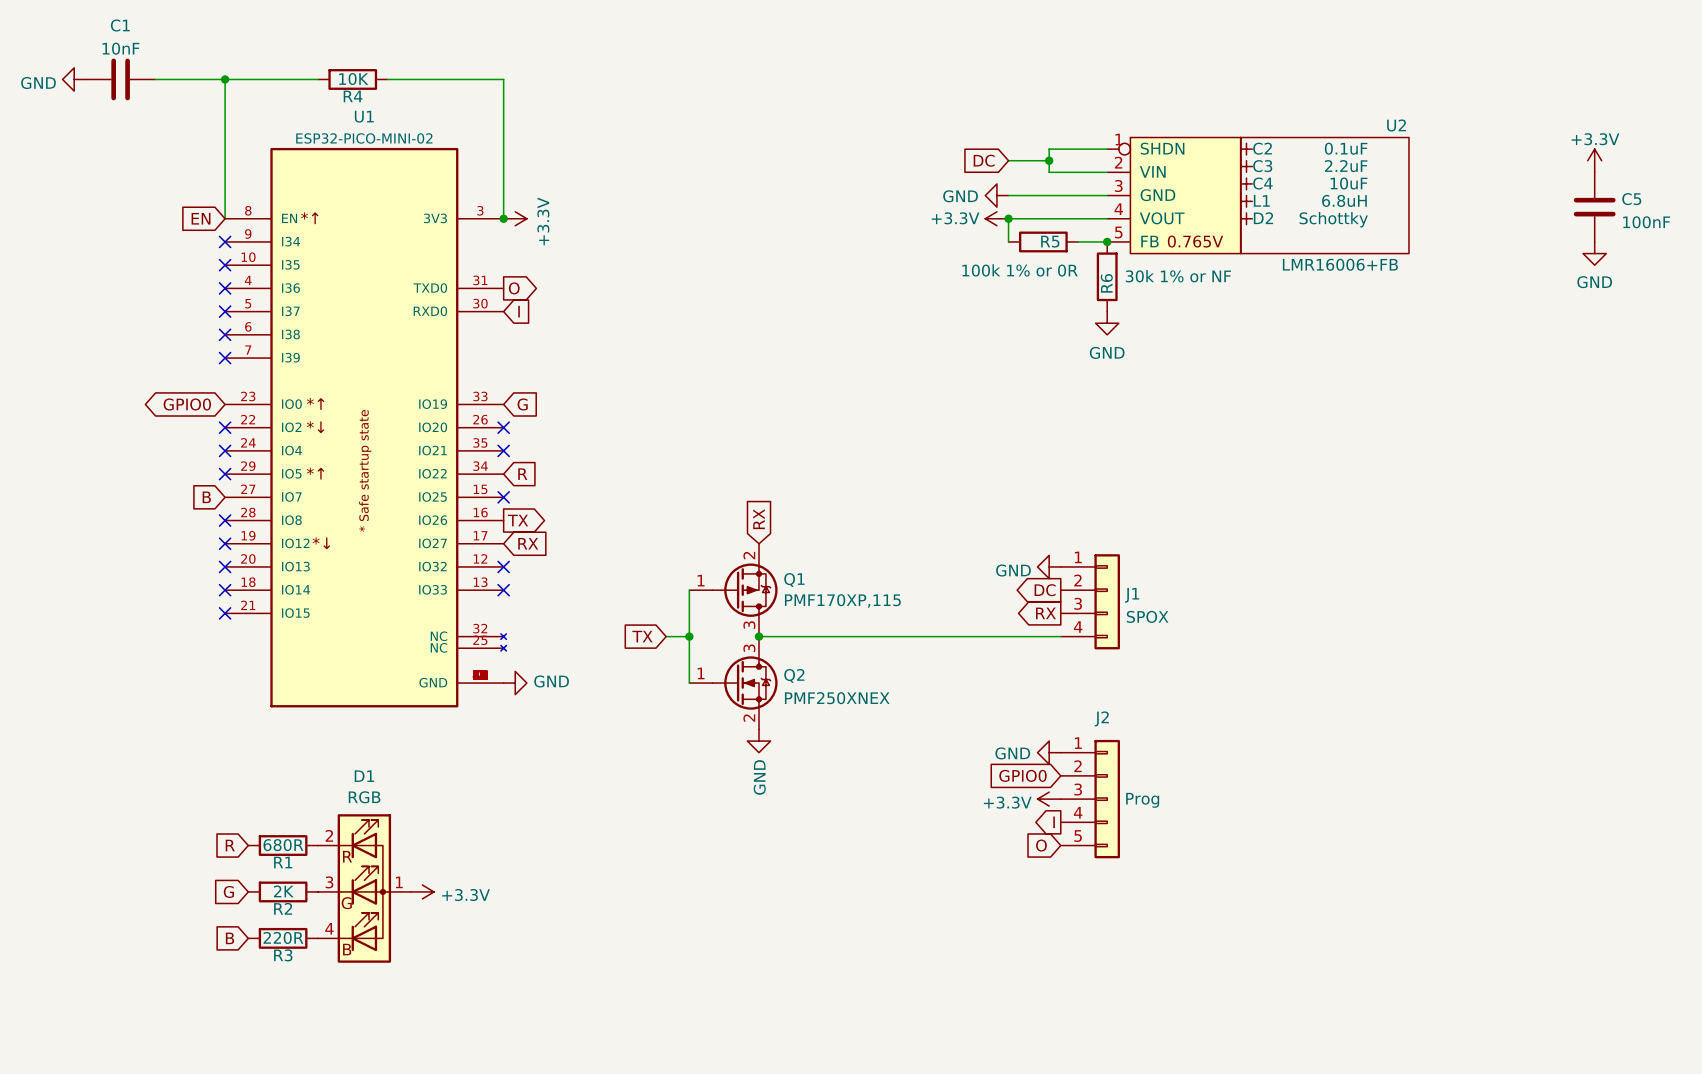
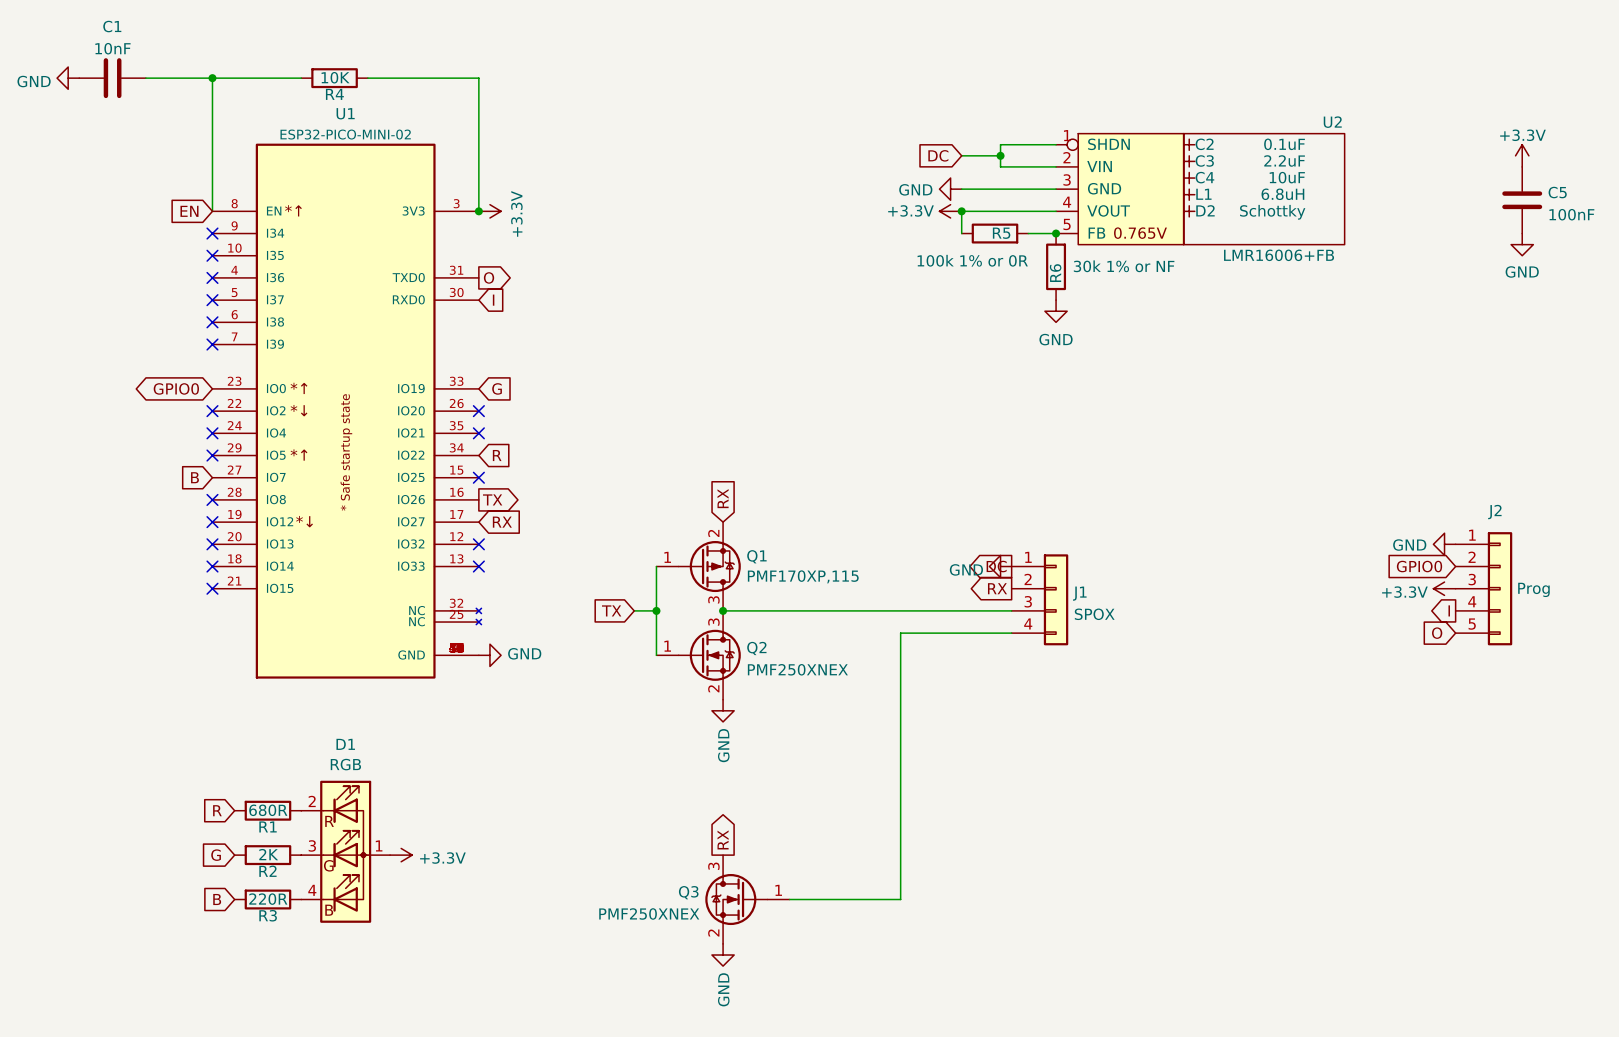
power symbol position: GND (1049, 566) -> GND (1000, 566)
power symbol: none -> GND (1444, 544)
global label: none -> GPIO0 (1419, 566)
J1 position: (1090, 601) -> (1039, 599)
power symbol: none -> +3.3V (1444, 588)
global label: none -> I (1449, 610)
wire: none -> (1011, 633) (900, 633) (900, 899) (789, 899)
global label: none -> O (1437, 633)
power symbol: GND (1049, 752) -> none
global label: GPIO0 (1022, 775) -> none
power symbol: +3.3V (1049, 799) -> none
J2 position: (1090, 799) -> (1483, 588)
global label: I (1054, 822) -> none
global label: O (1041, 845) -> none
global label: none -> RX (723, 839)
Q3: none -> PMF250XNEX (747, 899)
power symbol: none -> GND (723, 955)

